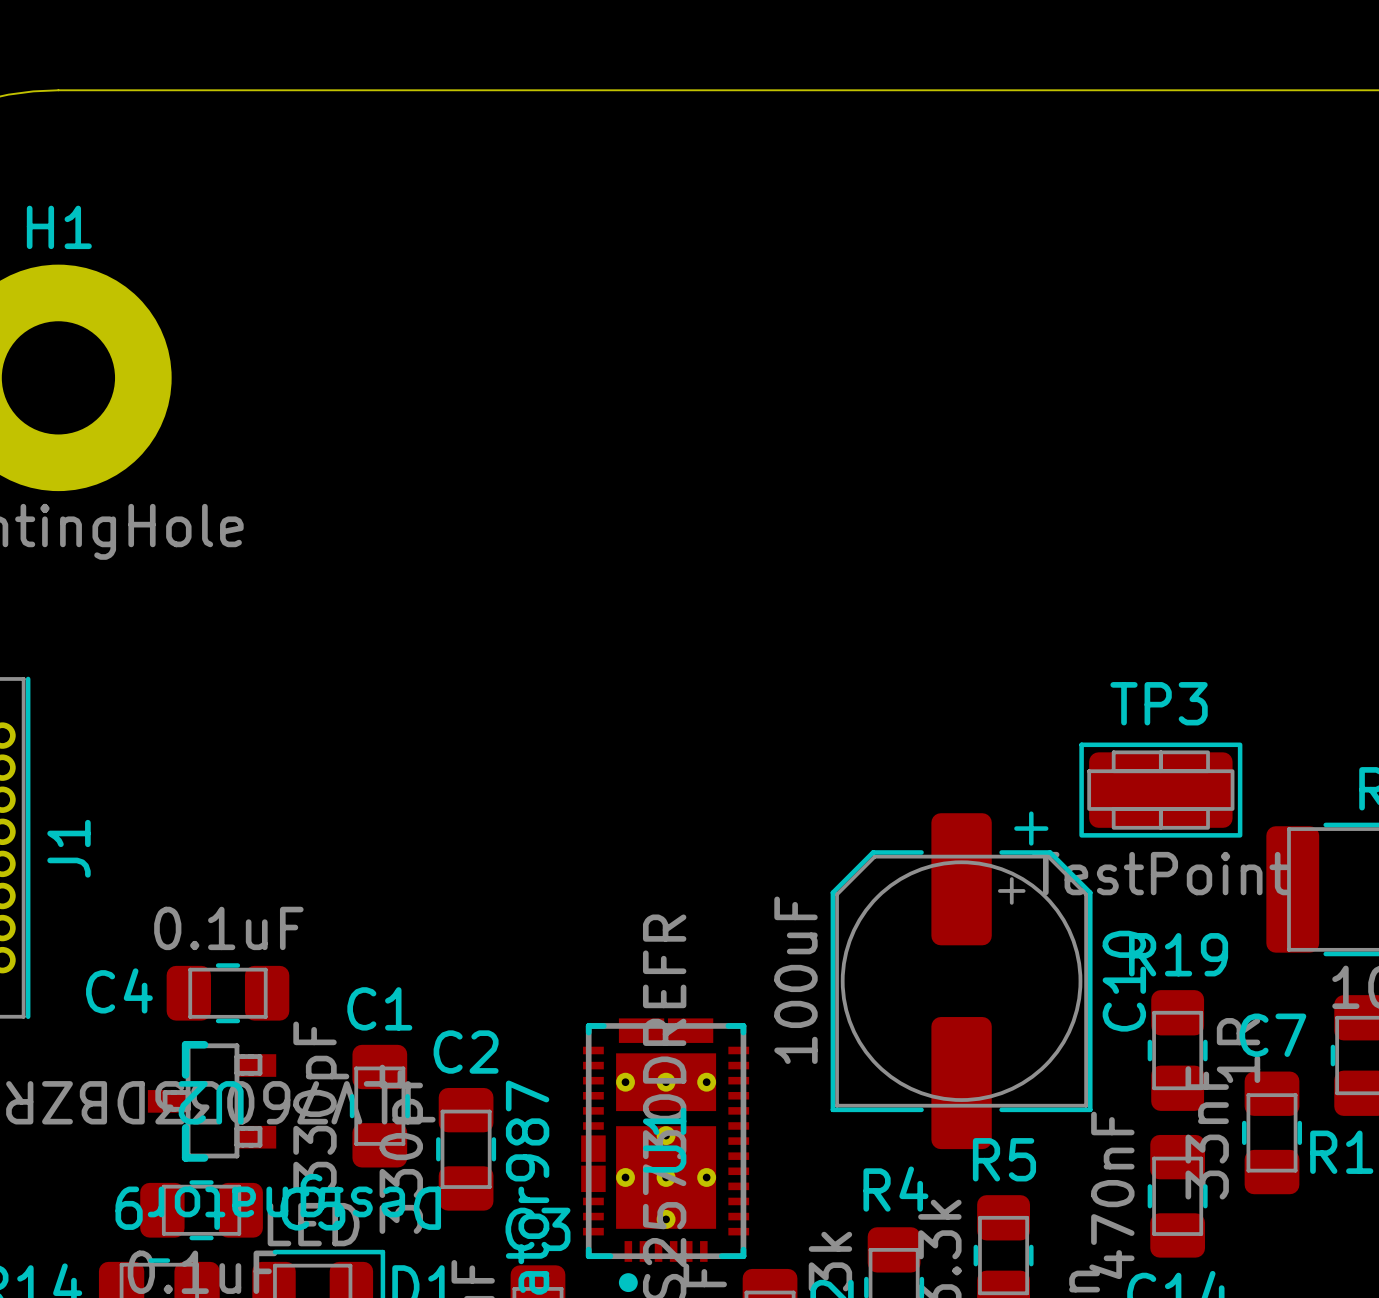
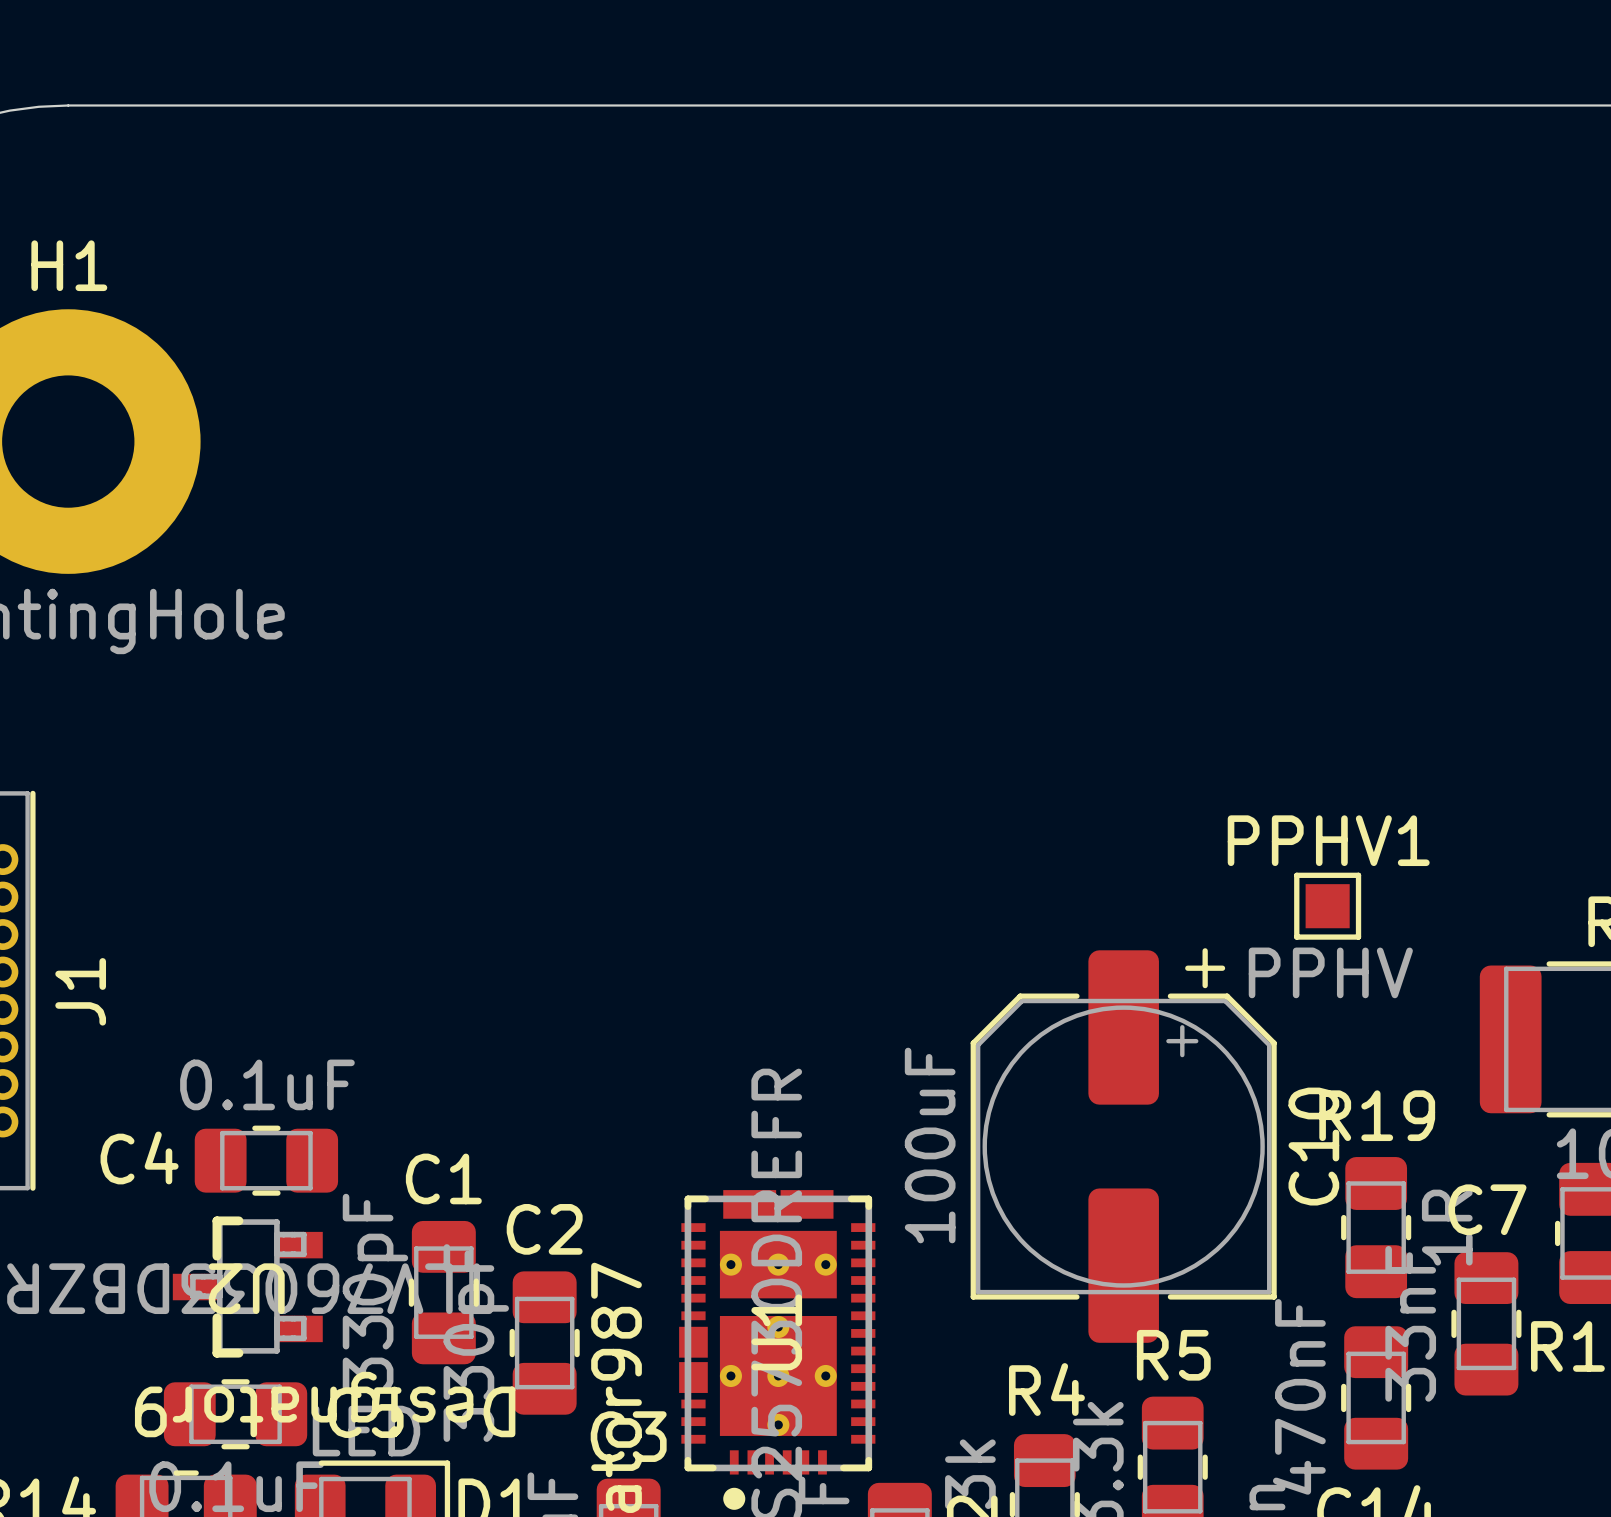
PPHV1: none -> PPHV (1327, 906)
TP3: TestPoint (1160, 790) -> none

